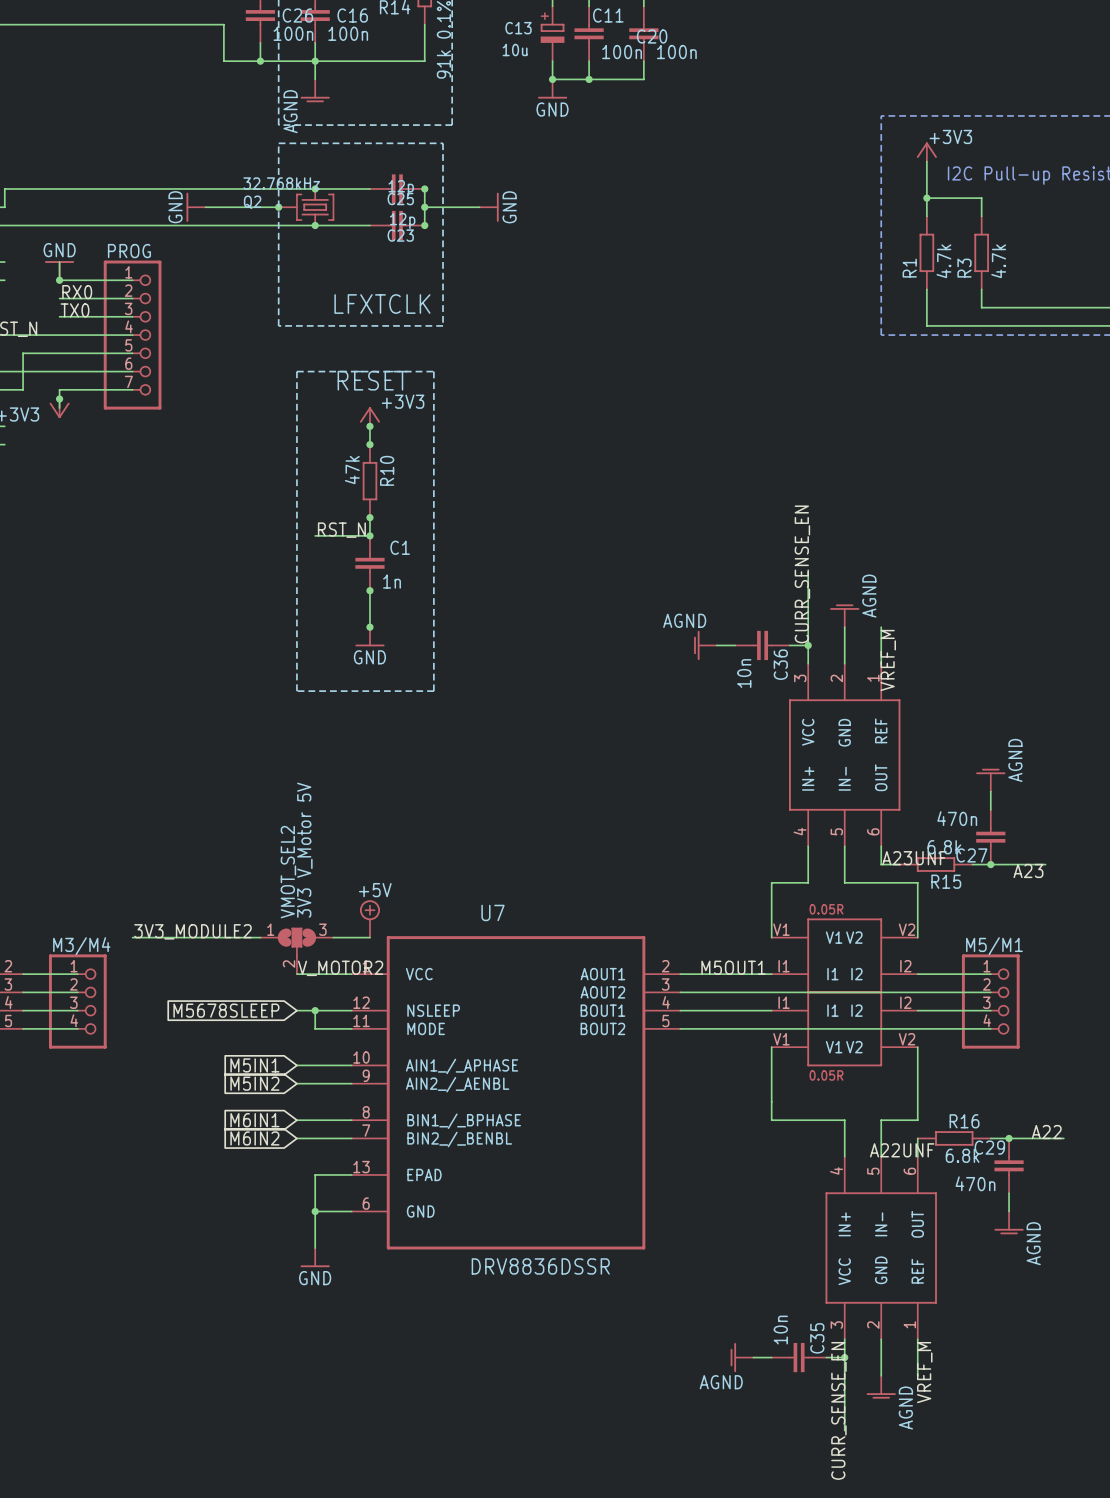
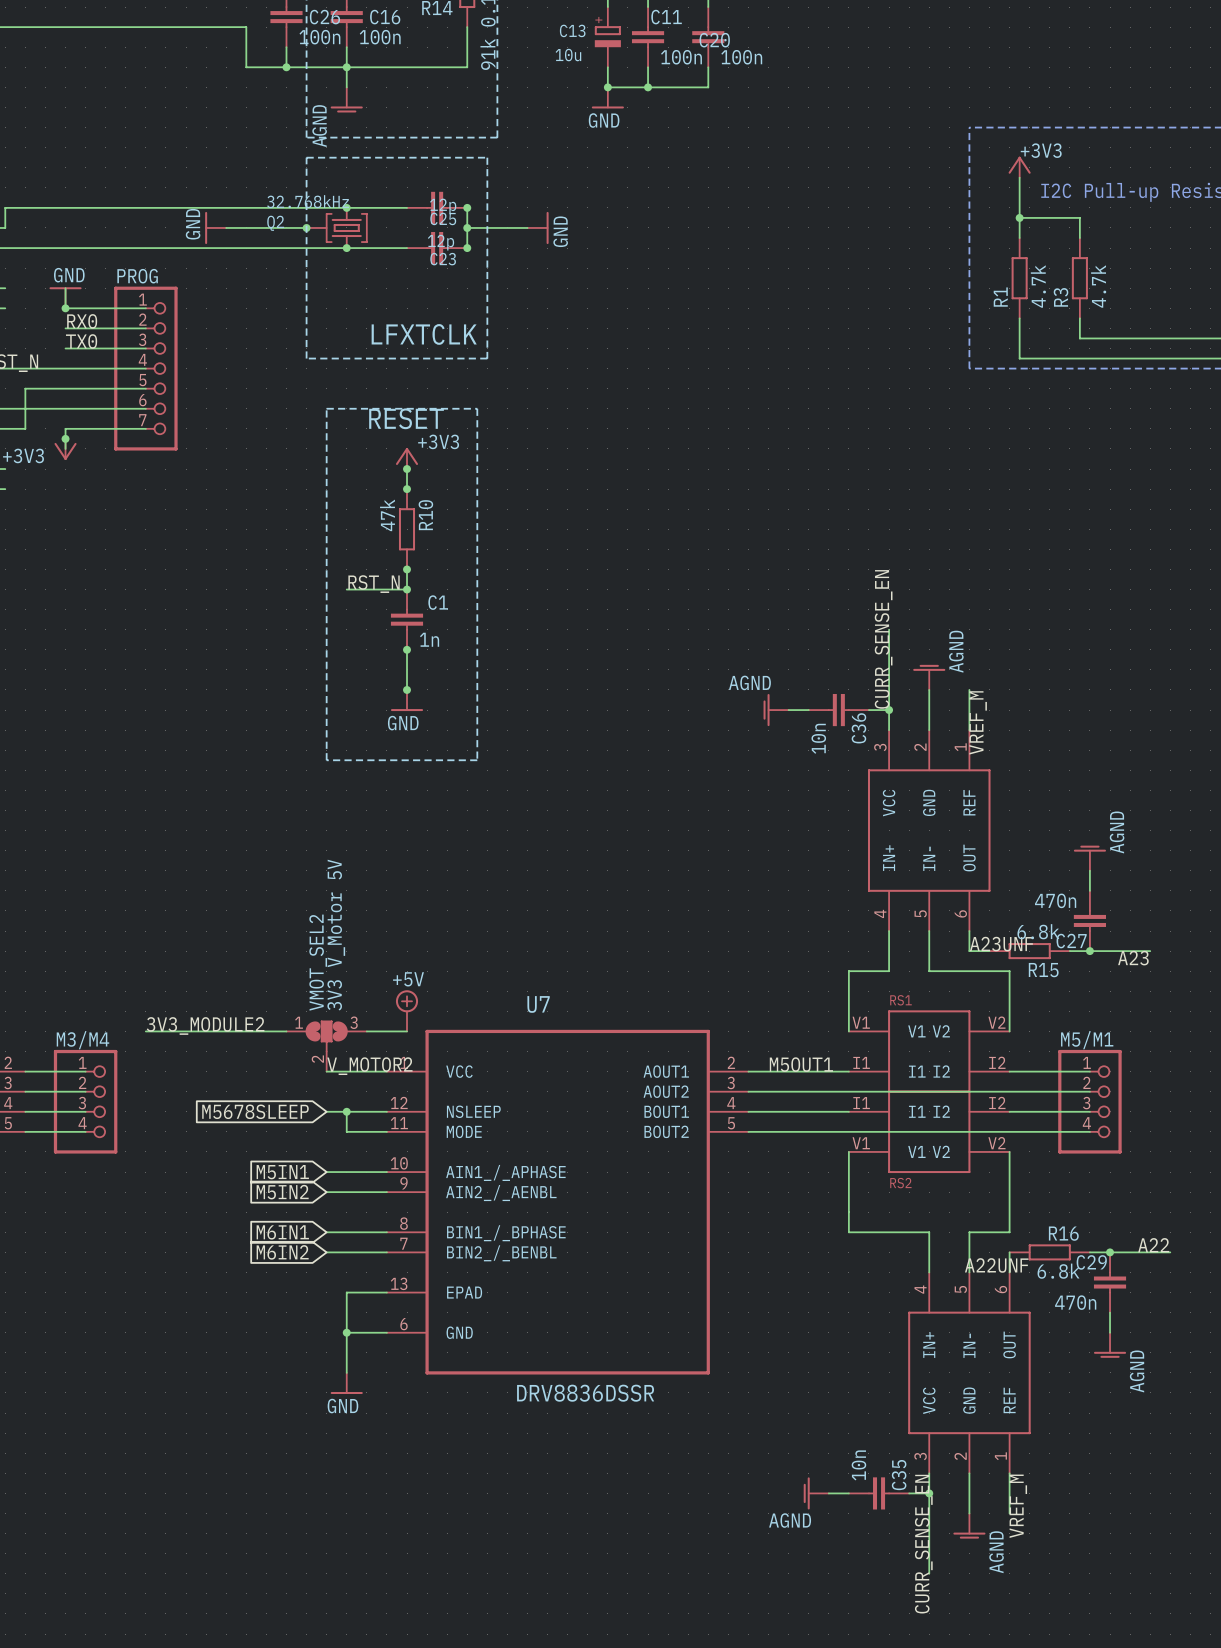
part value: 0.05R (826, 909) -> RS1 (901, 1000)
part value: 0.05R (826, 1075) -> RS2 (900, 1183)

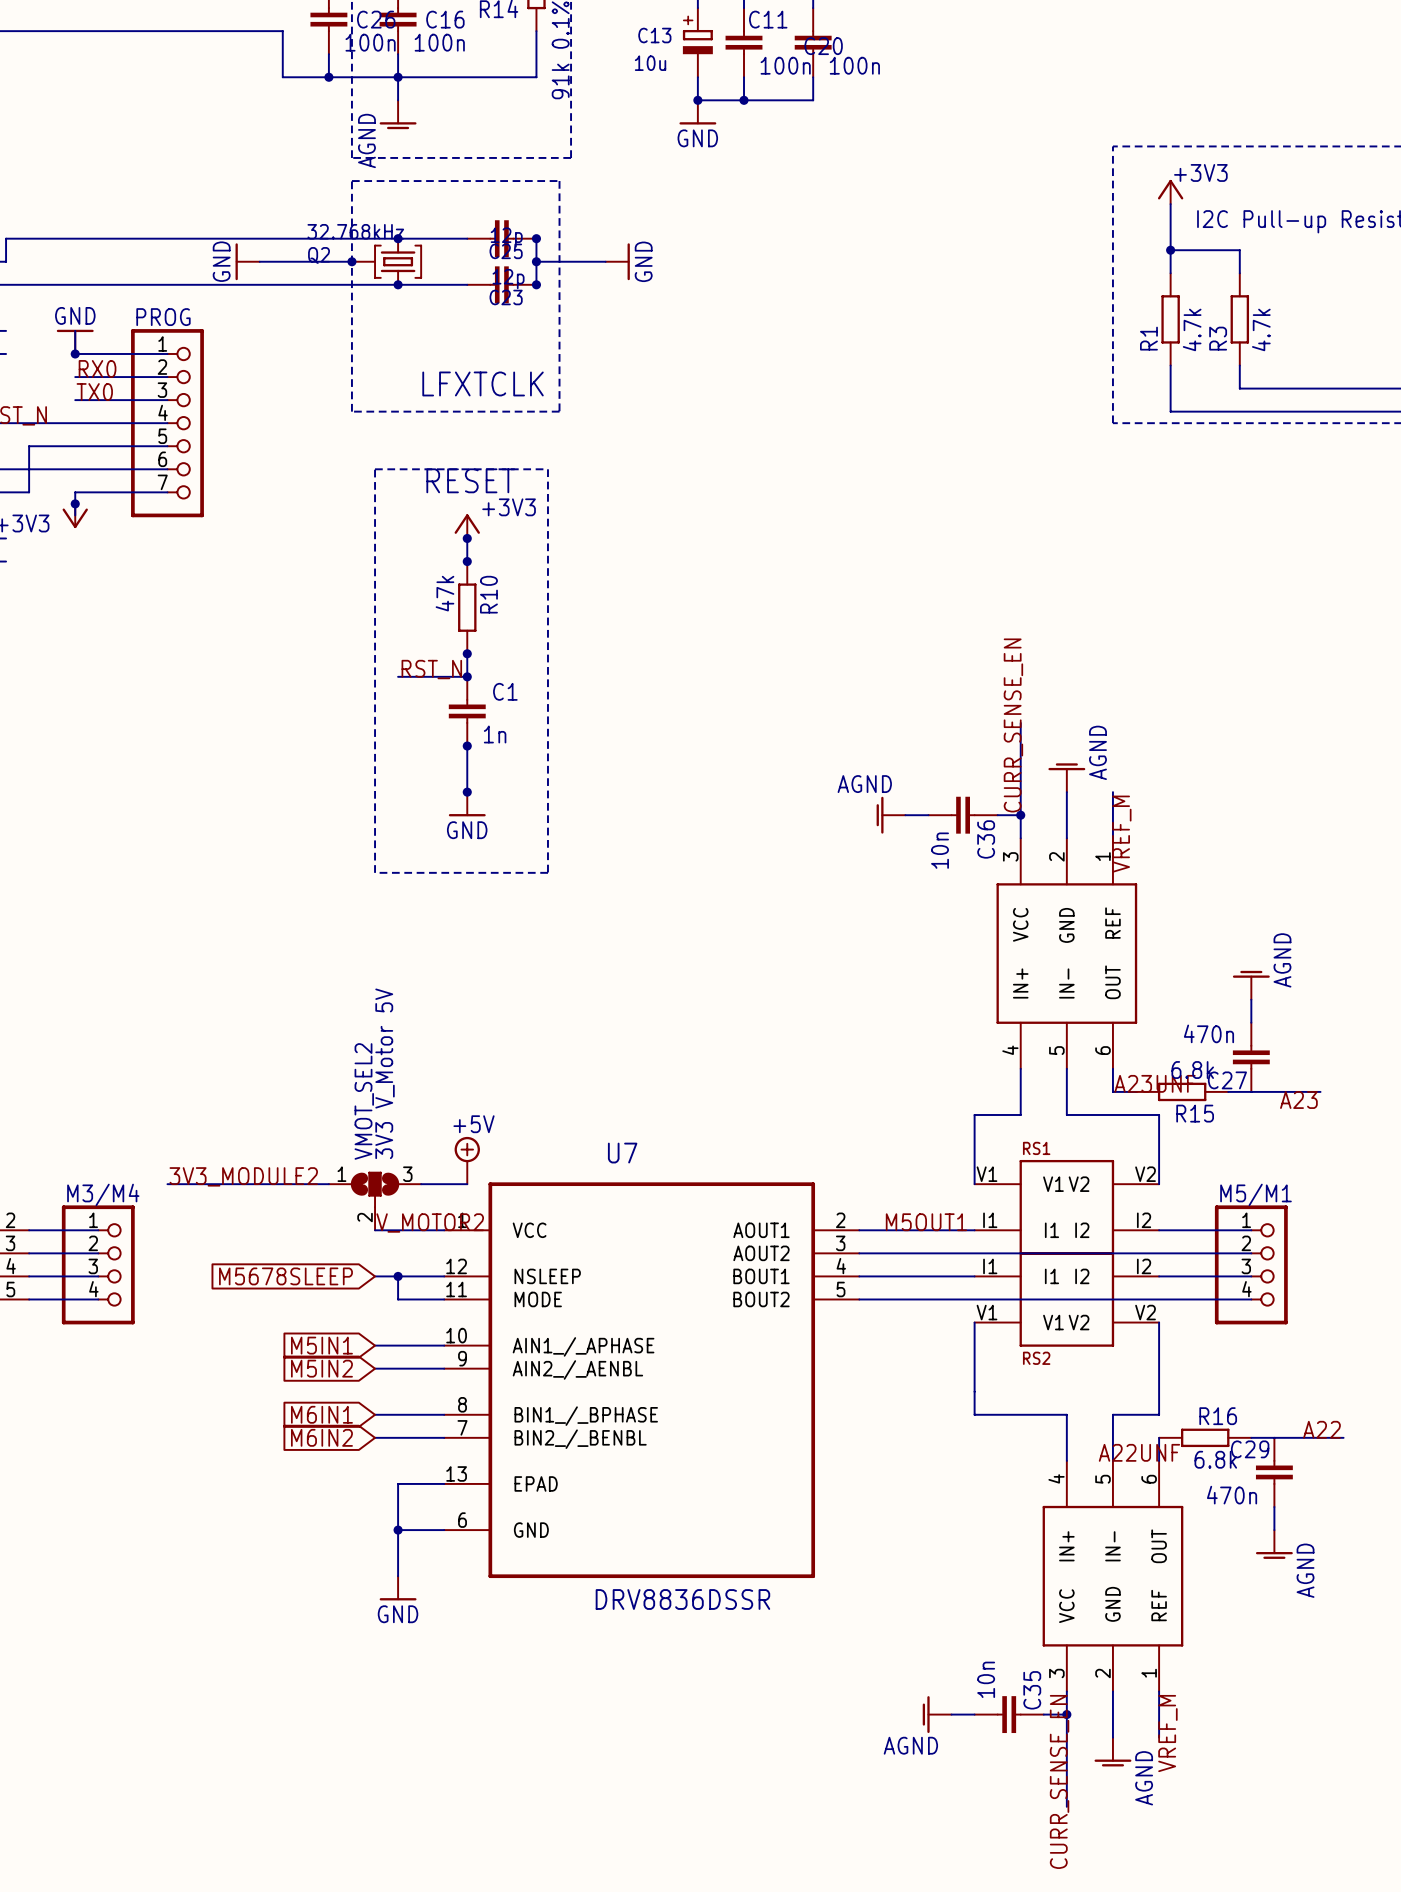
junction: (1089, 951) -> none
junction: (1110, 1252) -> none

